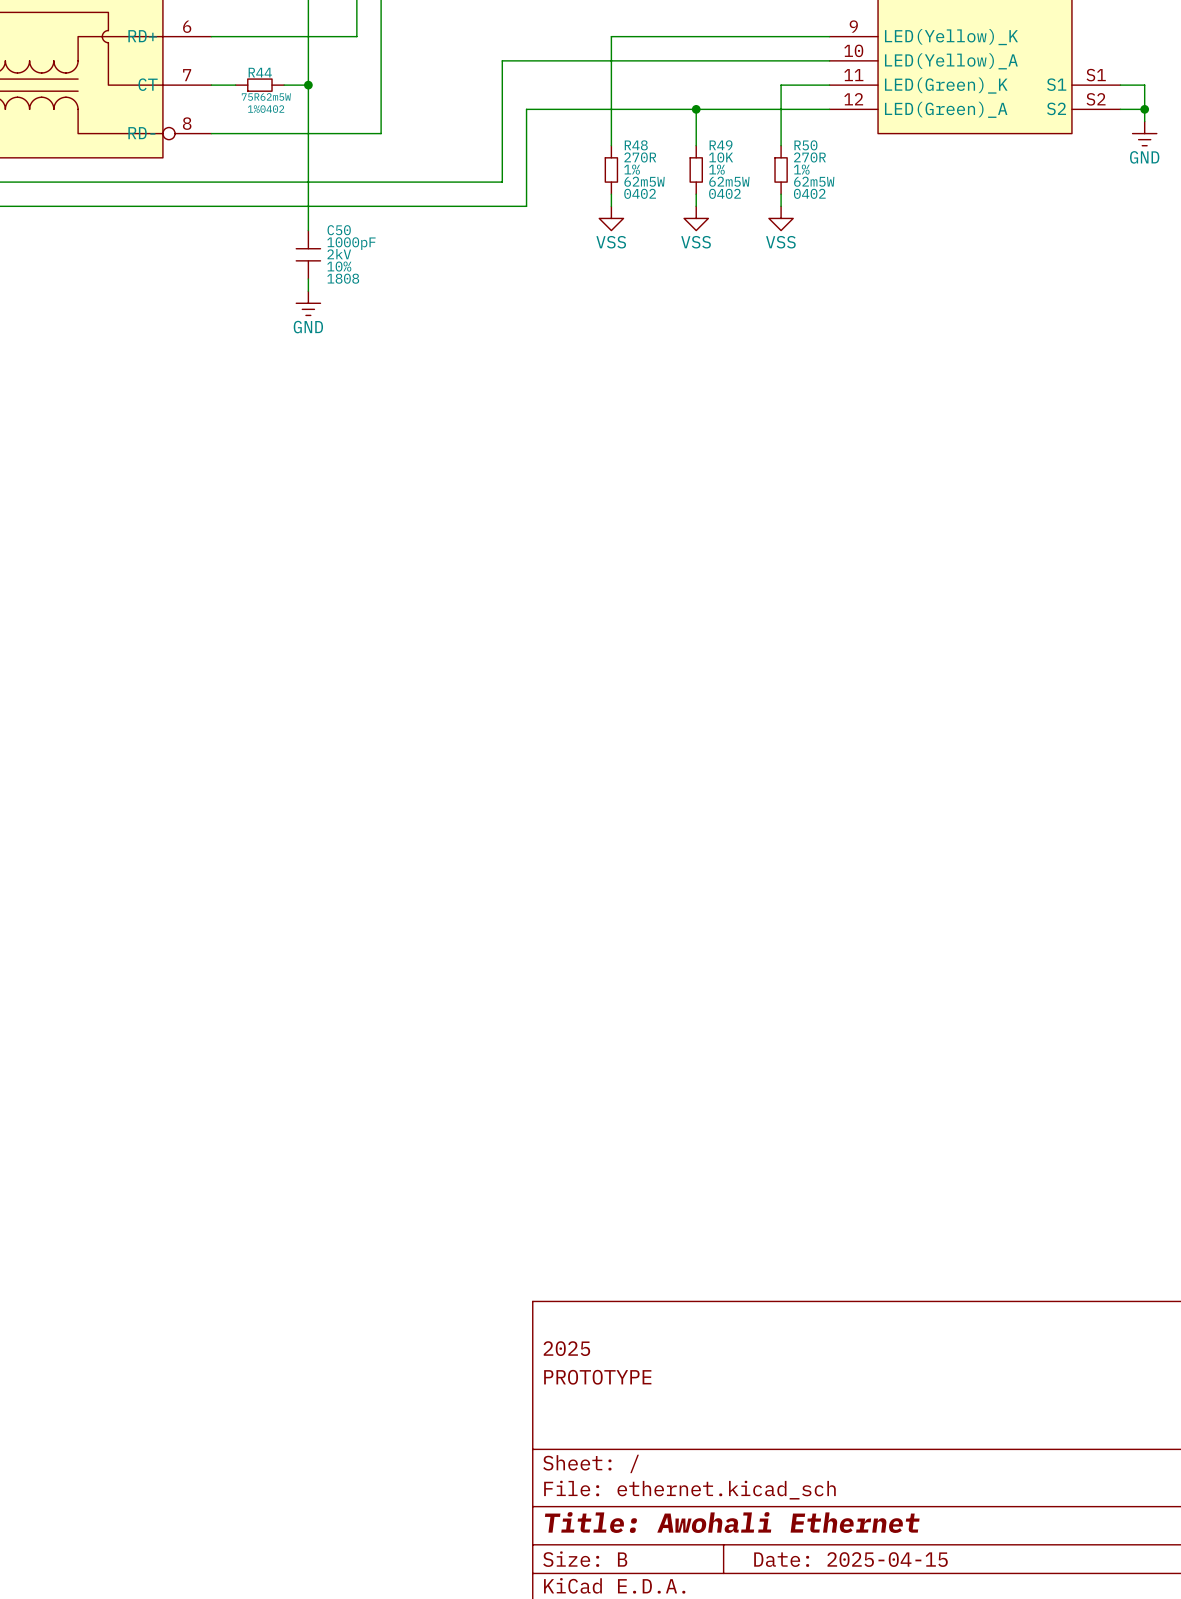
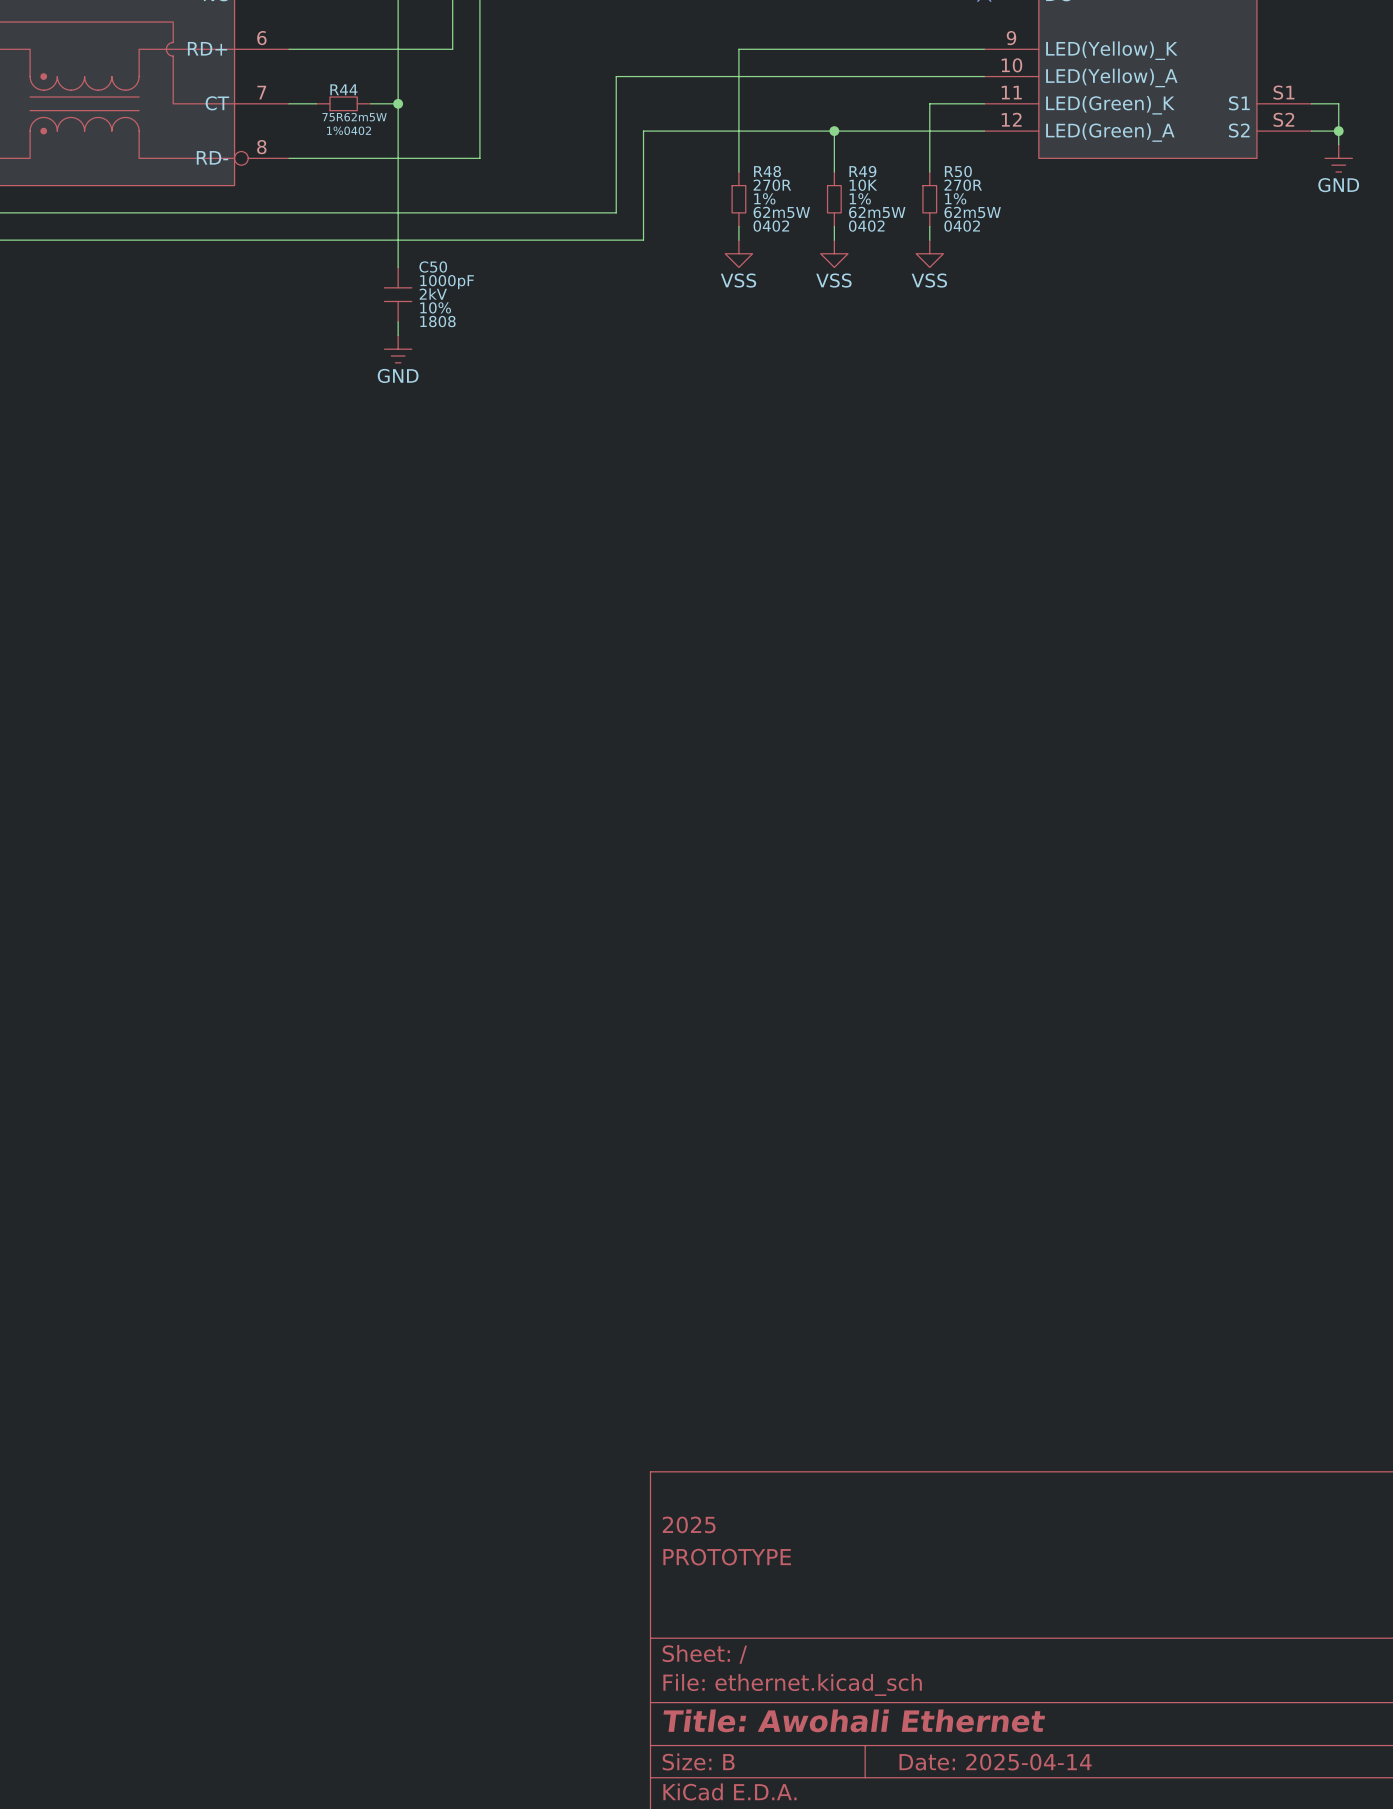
title block: Date: 2025-04-15 (850, 1559) -> Date: 2025-04-14 (995, 1762)

